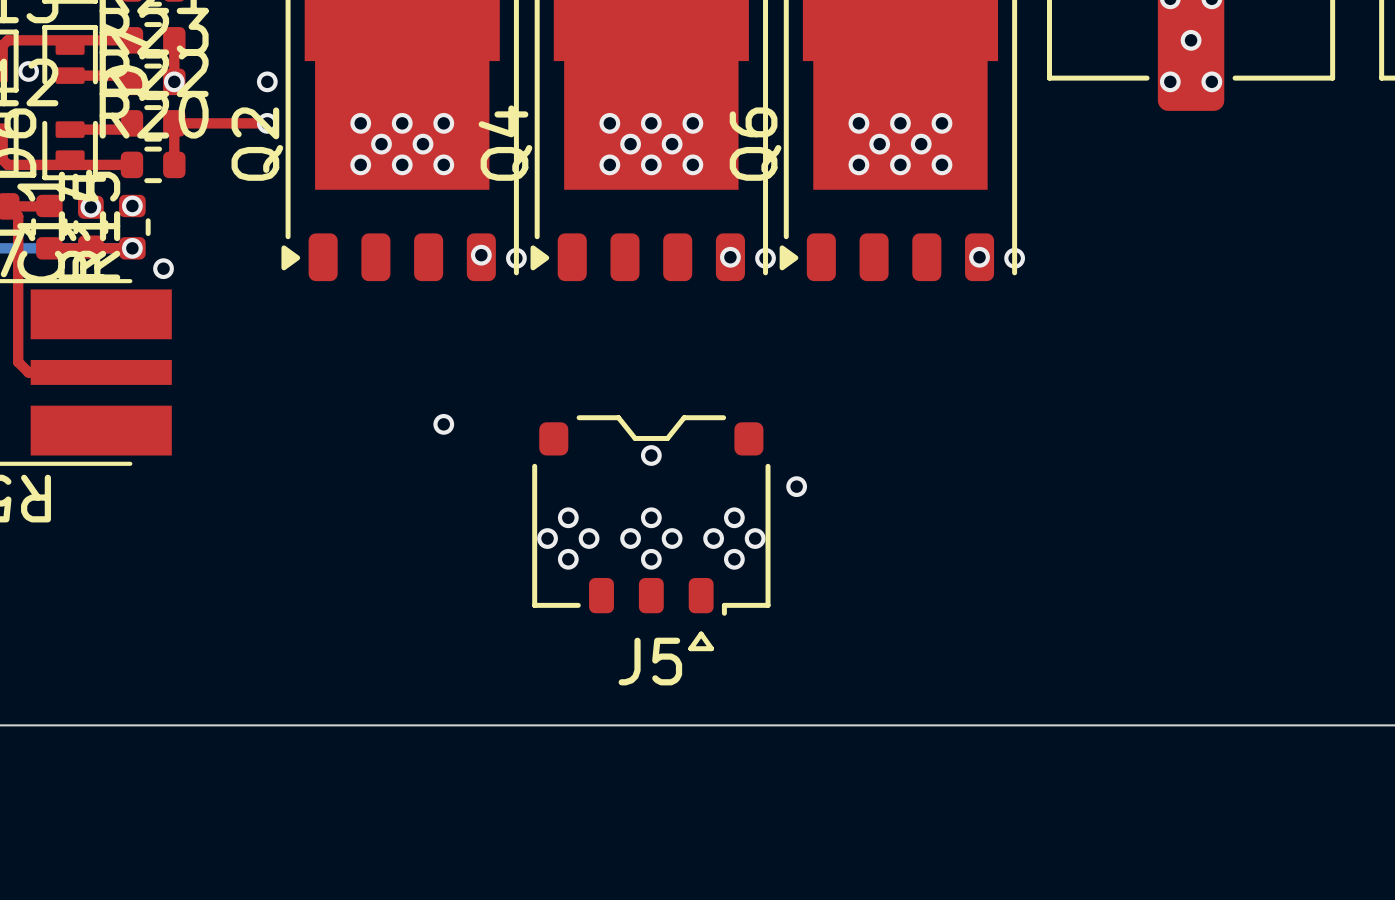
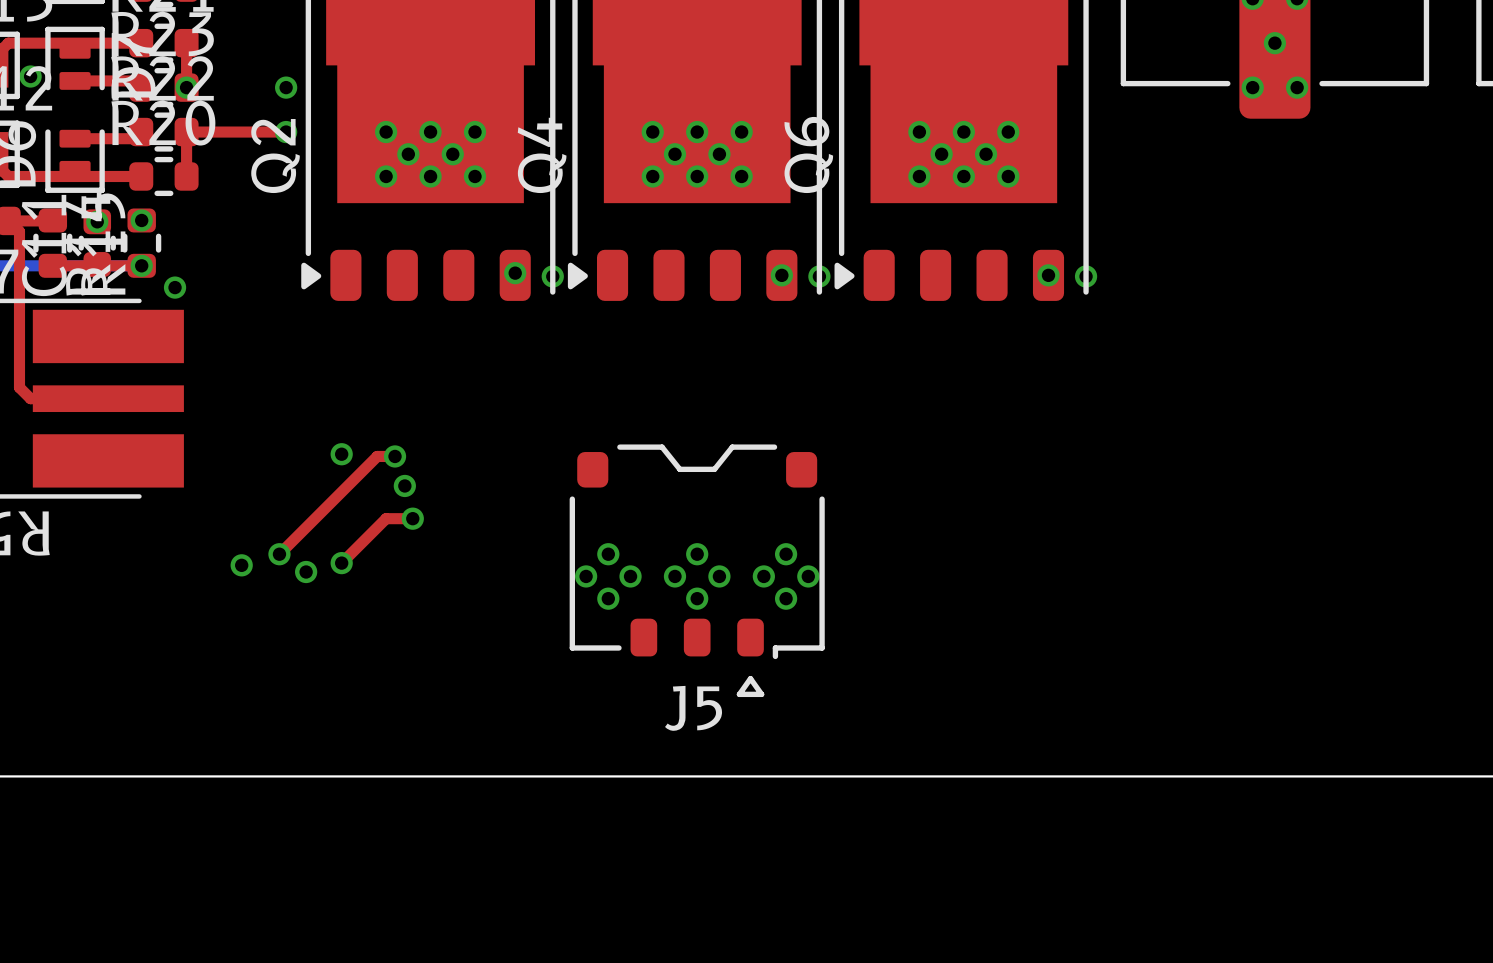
via: none -> (341, 454)
via: (443, 424) -> none
top track: none -> (395, 456) (377, 456) (279, 554)
via: none -> (395, 456)
via: none -> (404, 485)
via: (651, 455) -> none
top track: none -> (412, 518) (386, 518) (341, 563)
via: none -> (412, 518)
via: (796, 486) -> none
via: none -> (279, 554)
via: none -> (341, 563)
via: none -> (241, 565)
via: none -> (306, 572)

